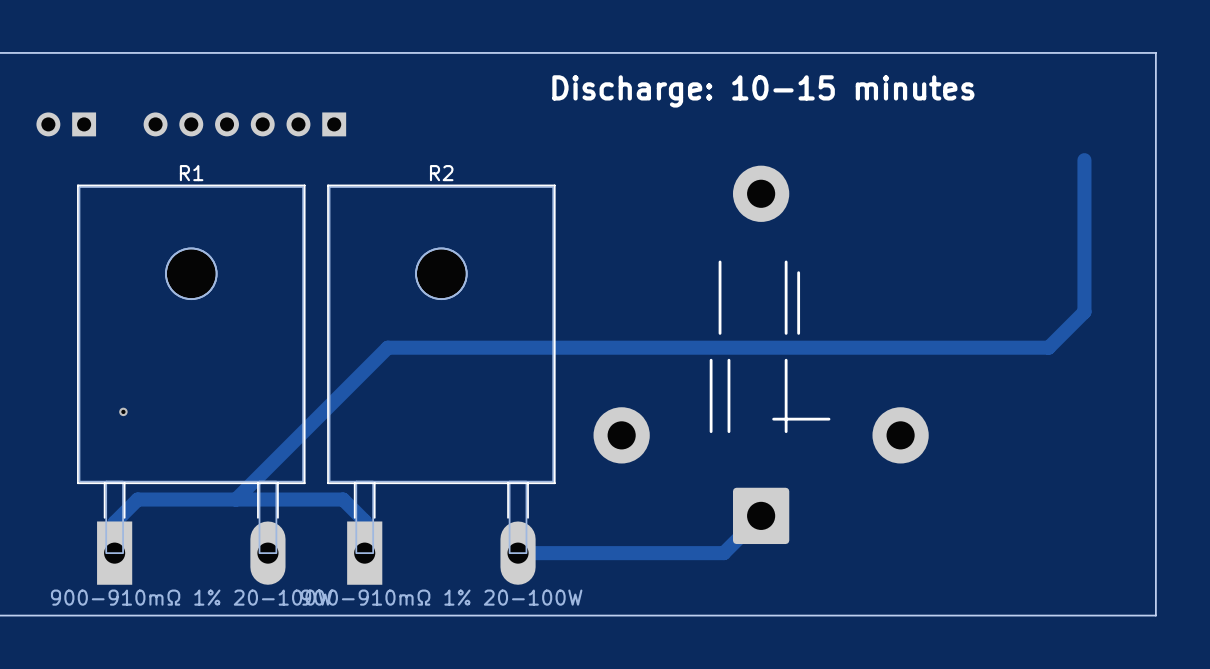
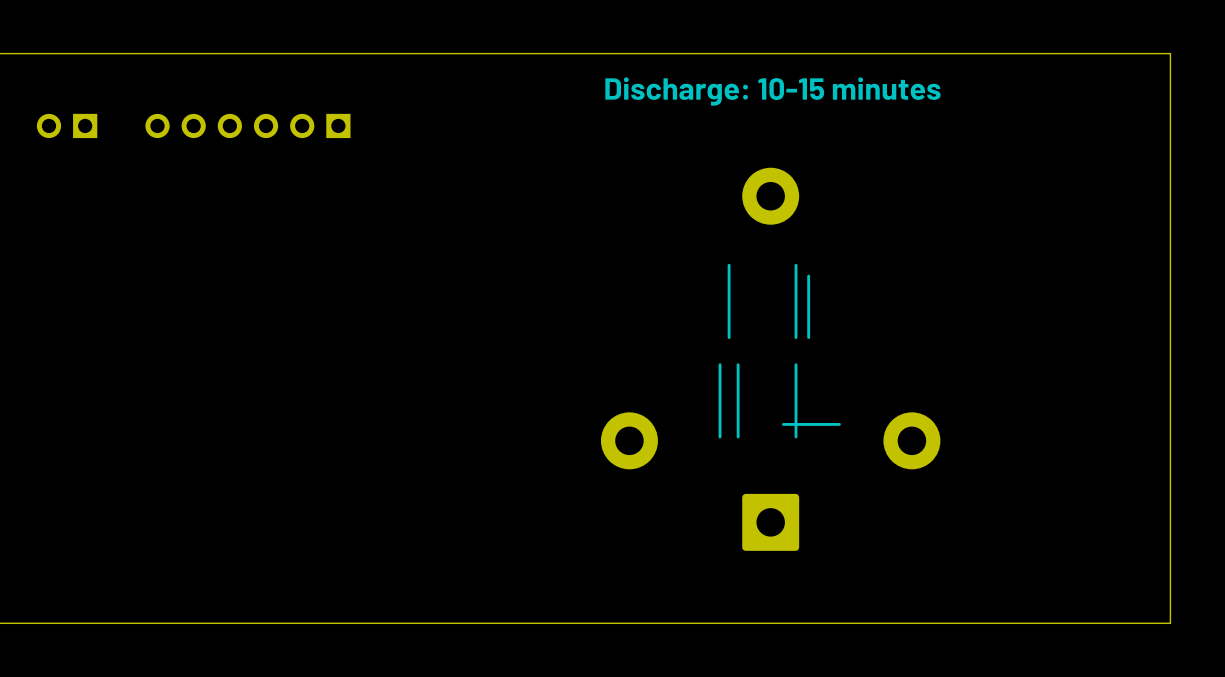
track: (1084, 160) (1084, 311) (1048, 347) (387, 347) (235, 499) -> none
R1: 900-910mΩ 1% 20-100W (191, 384) -> none
R2: 900-910mΩ 1% 20-100W (441, 384) -> none
via: (123, 411) -> none
track: (761, 515) (723, 553) (518, 553) -> none
track: (364, 553) (364, 521) (343, 499) (137, 499) (114, 522) (114, 553) -> none

